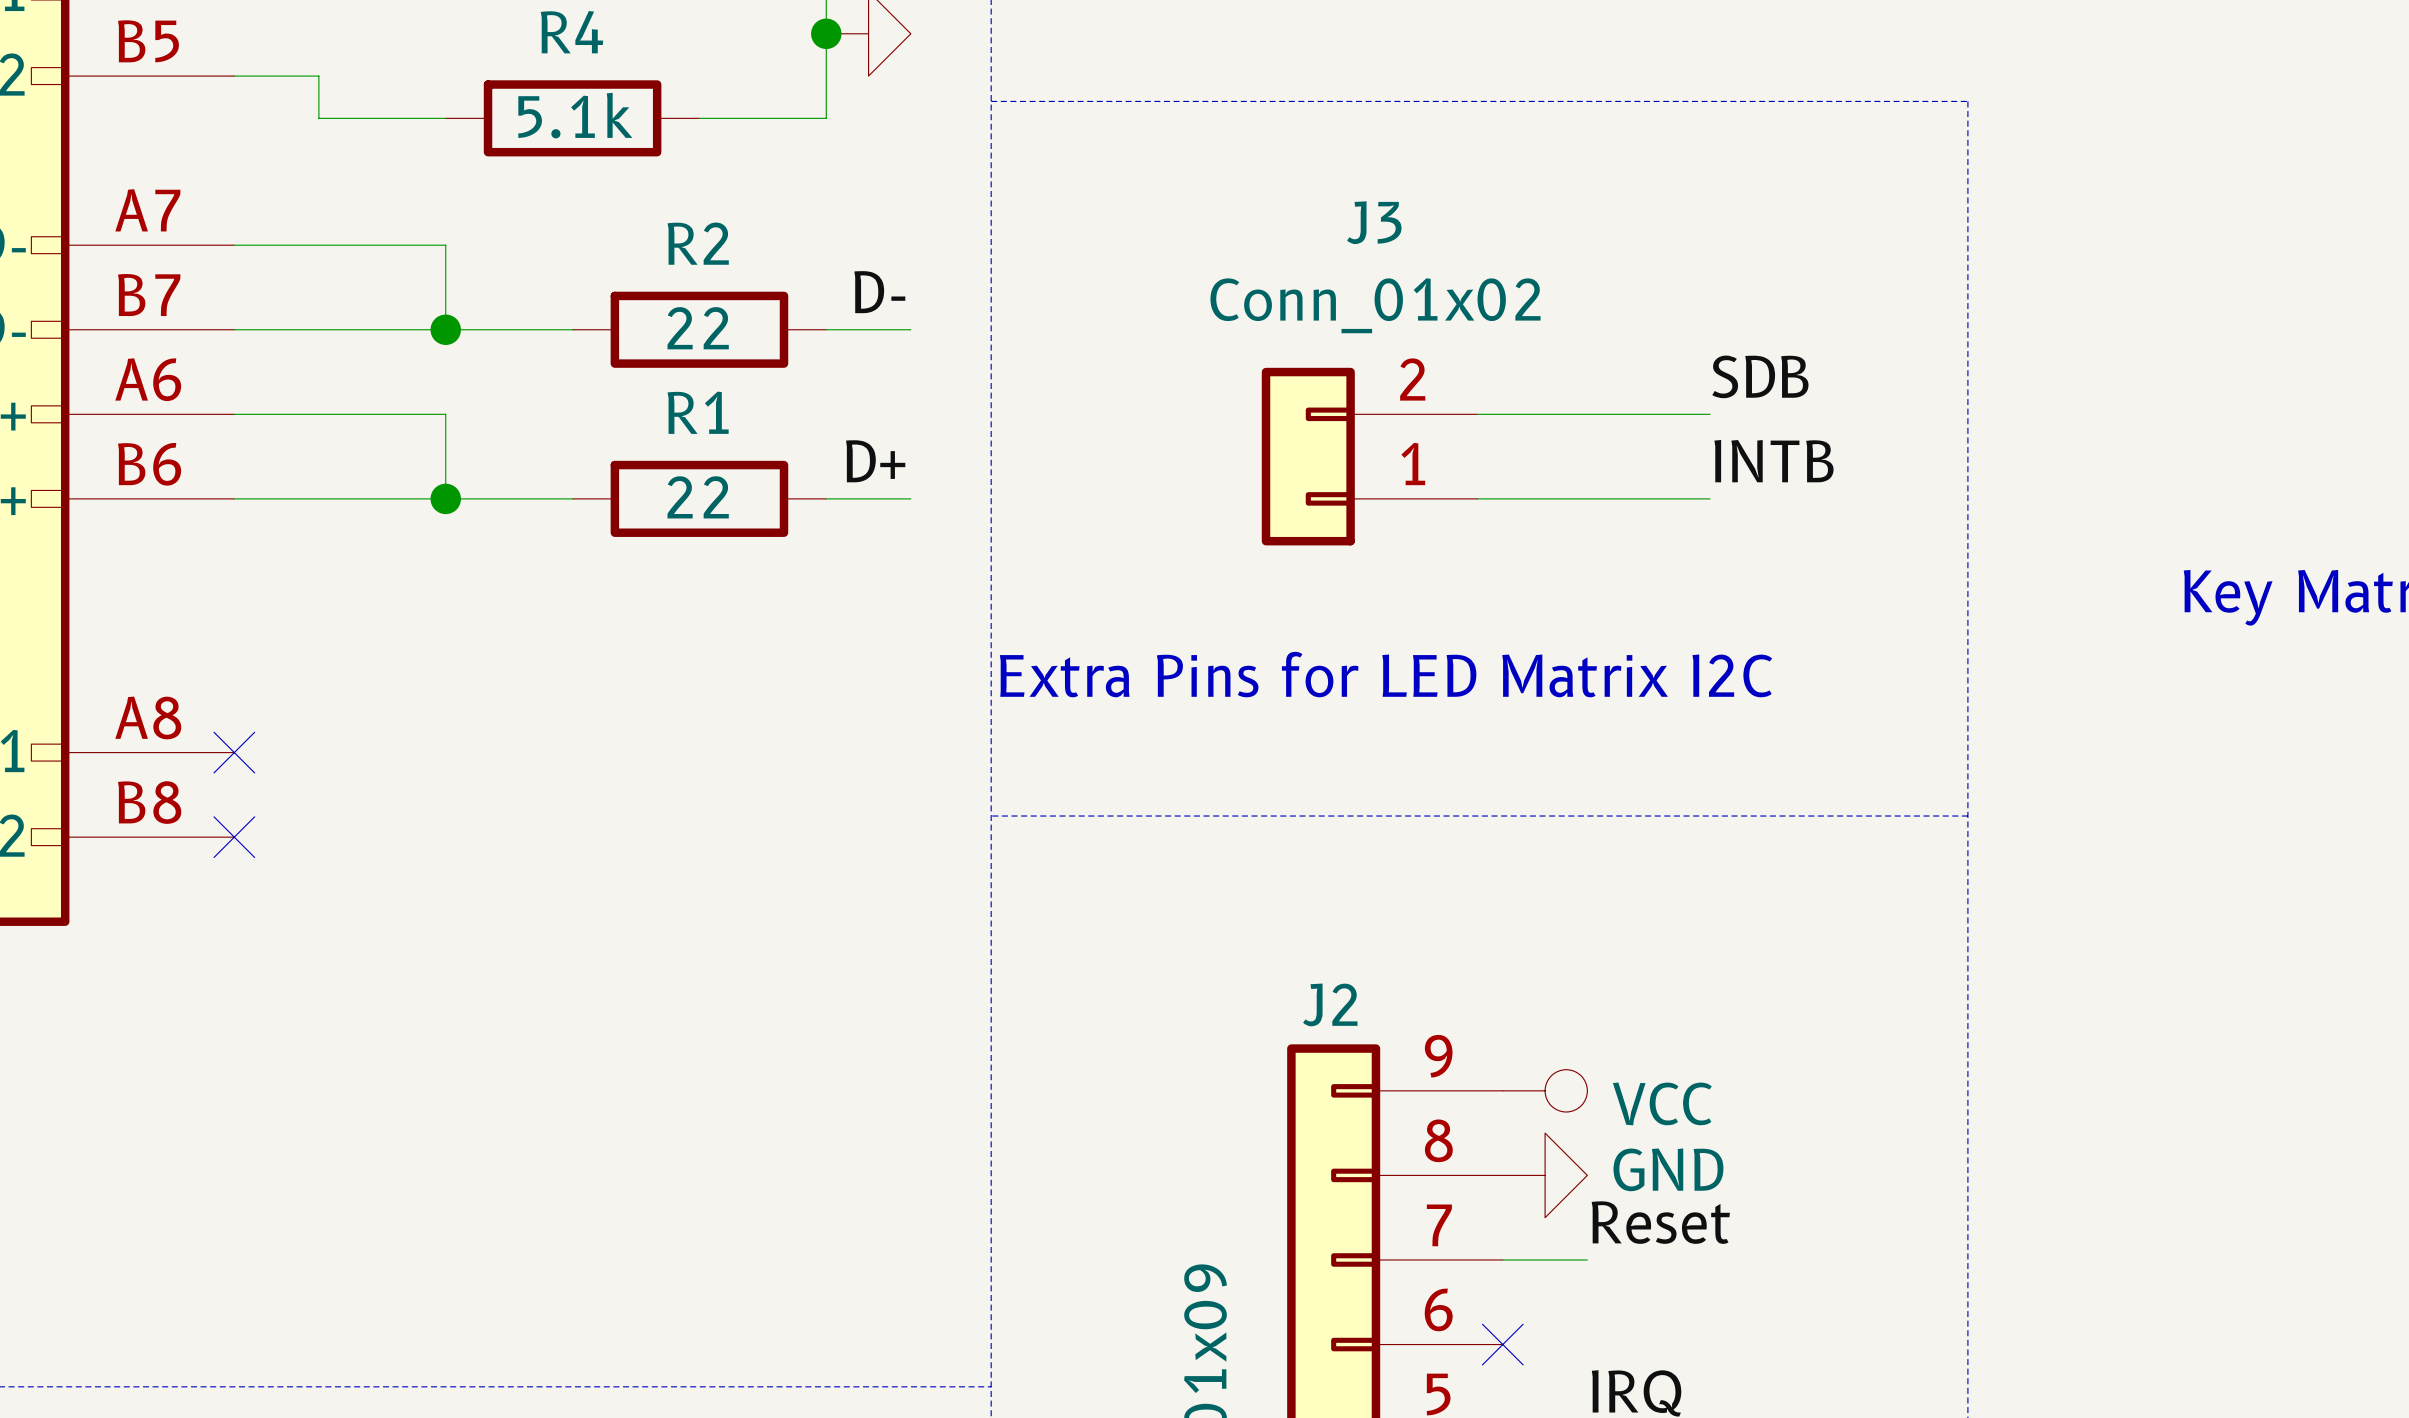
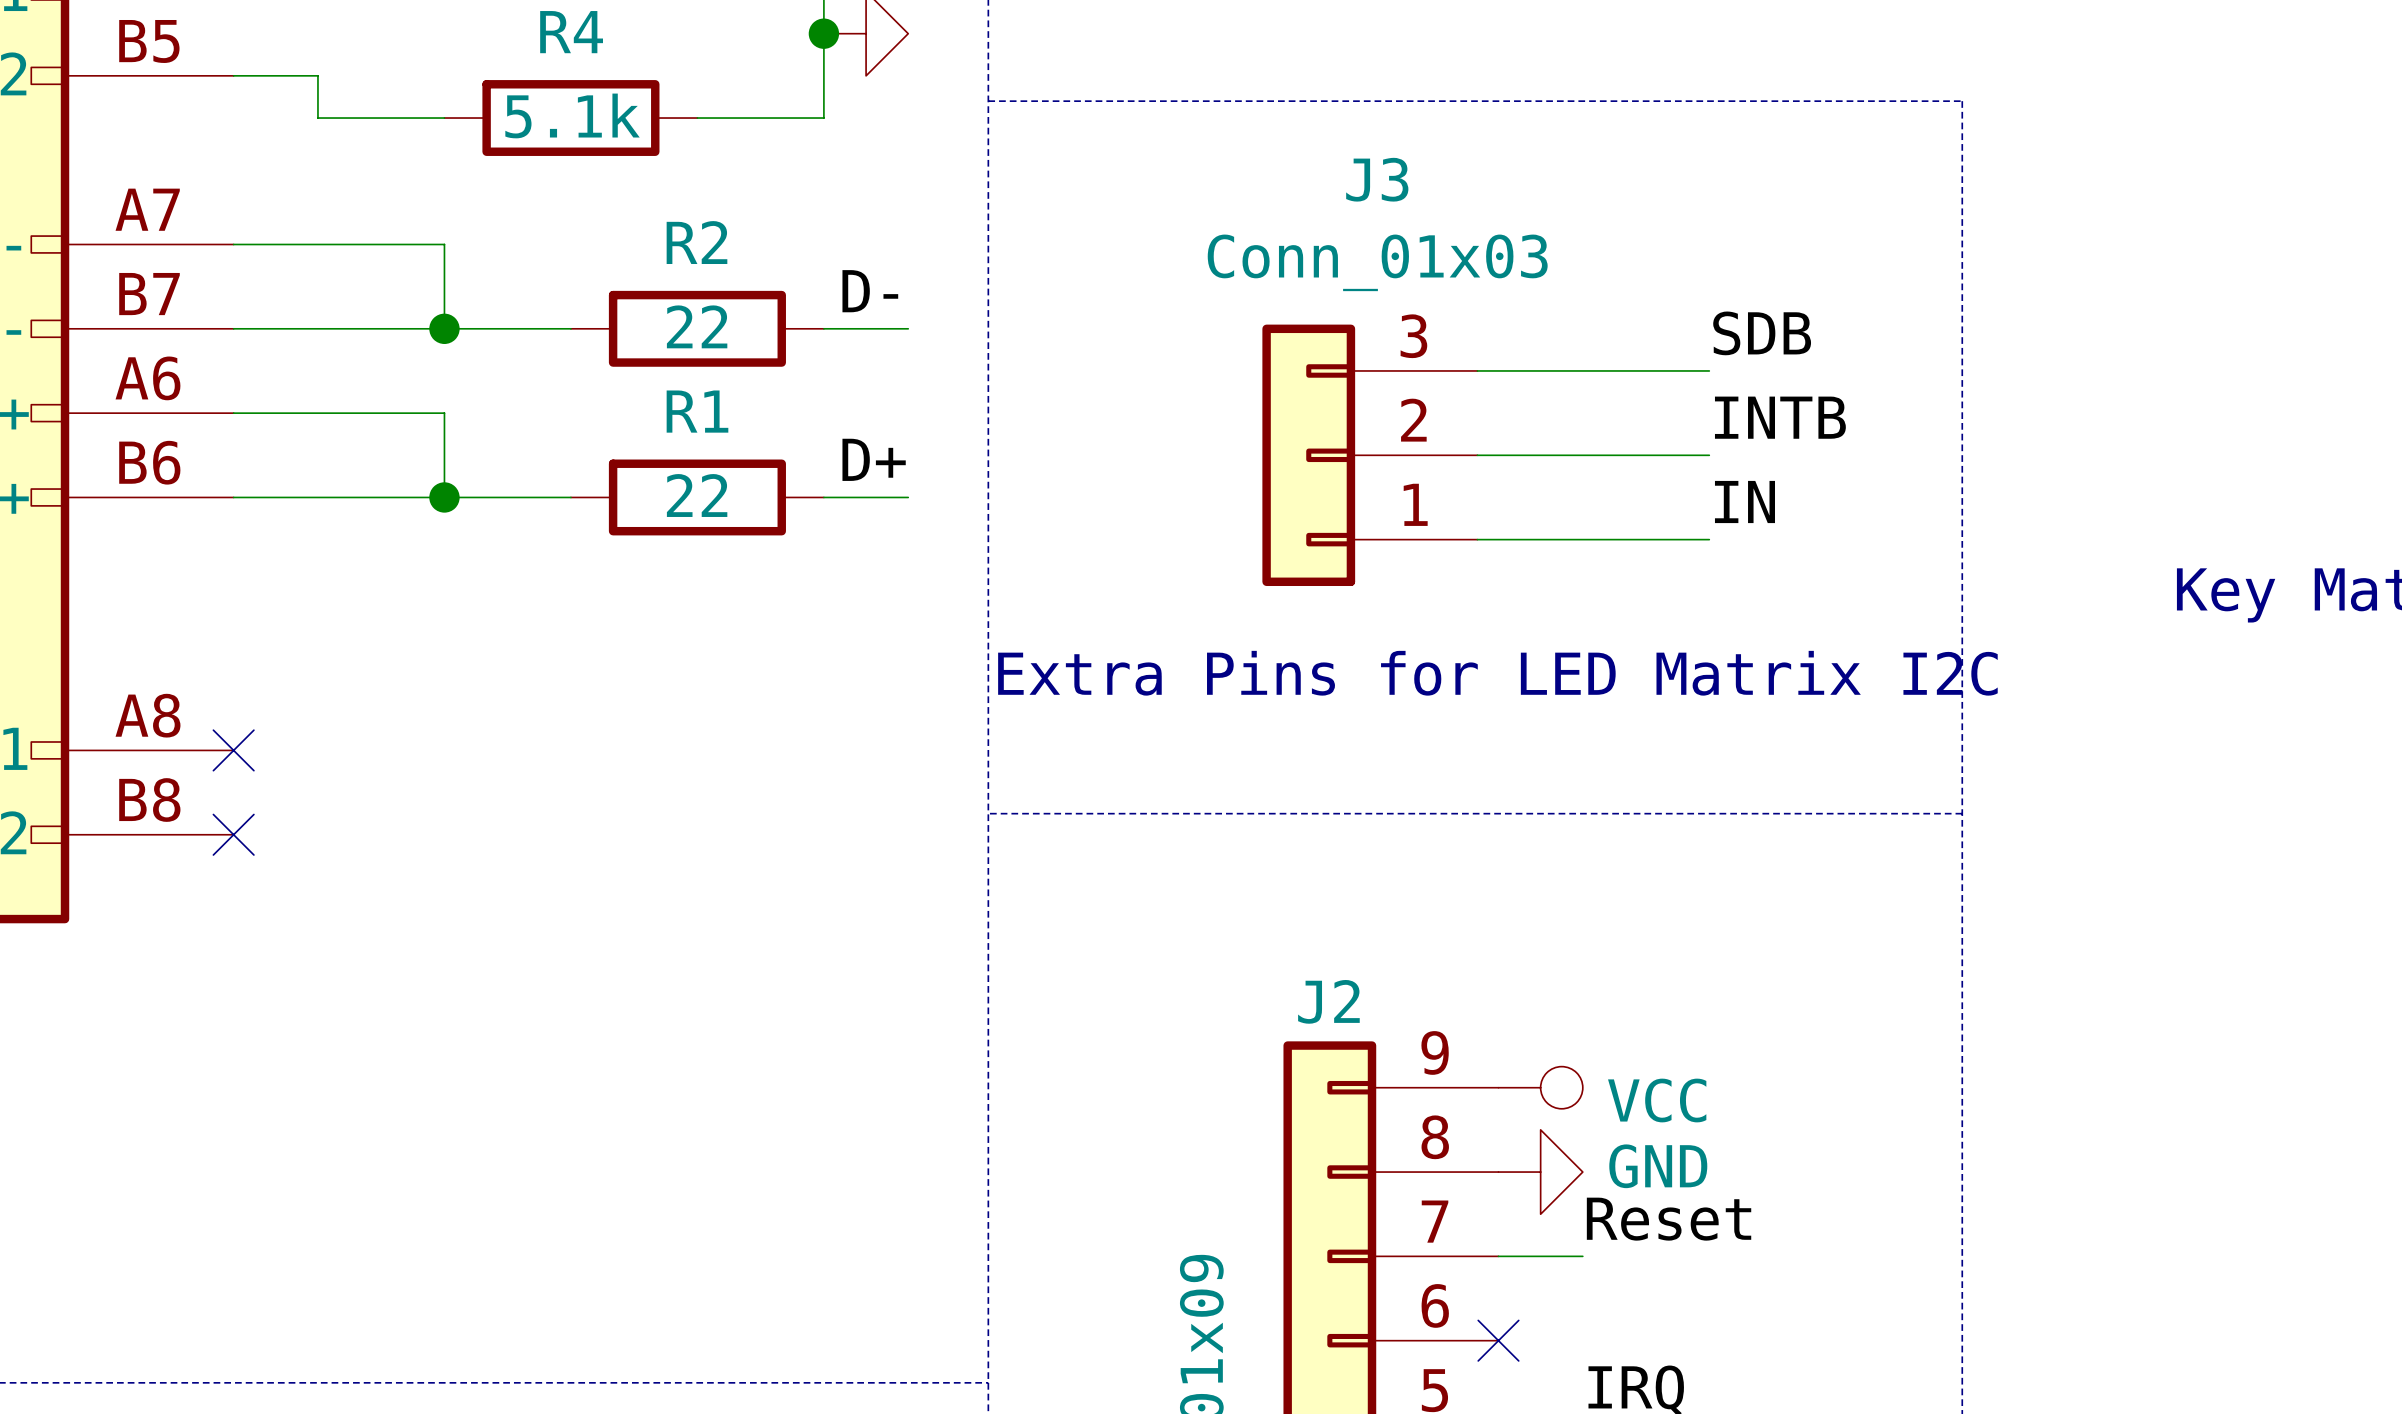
J3 value: Conn_01x02 (1375, 305) -> Conn_01x03 (1377, 262)
J3 symbol: [1261, 367, 1478, 546] -> [1262, 324, 1478, 587]
wire: none -> (1477, 370) (1709, 370)
label position: SDB (1760, 376) -> SDB (1762, 333)
wire: (1477, 414) (1709, 414) -> (1477, 455) (1709, 455)
label position: INTB (1773, 461) -> INTB (1780, 417)
wire: (1477, 498) (1709, 498) -> (1477, 539) (1709, 539)
label: none -> IN (1744, 502)

